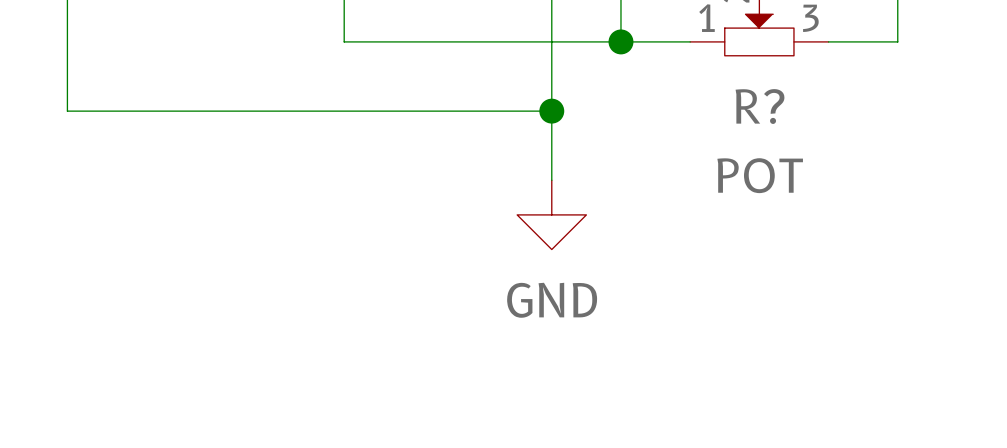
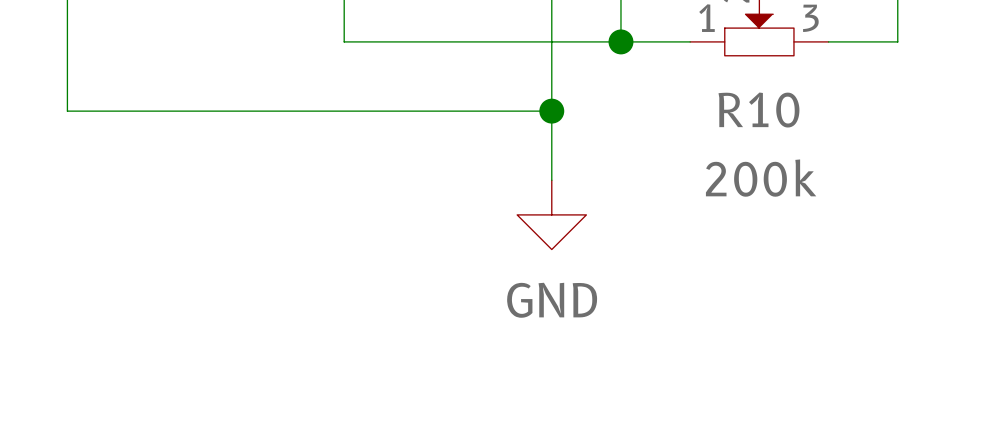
R? name: R? (760, 106) -> R10 (758, 110)
R? value: POT (760, 175) -> 200k (761, 178)

